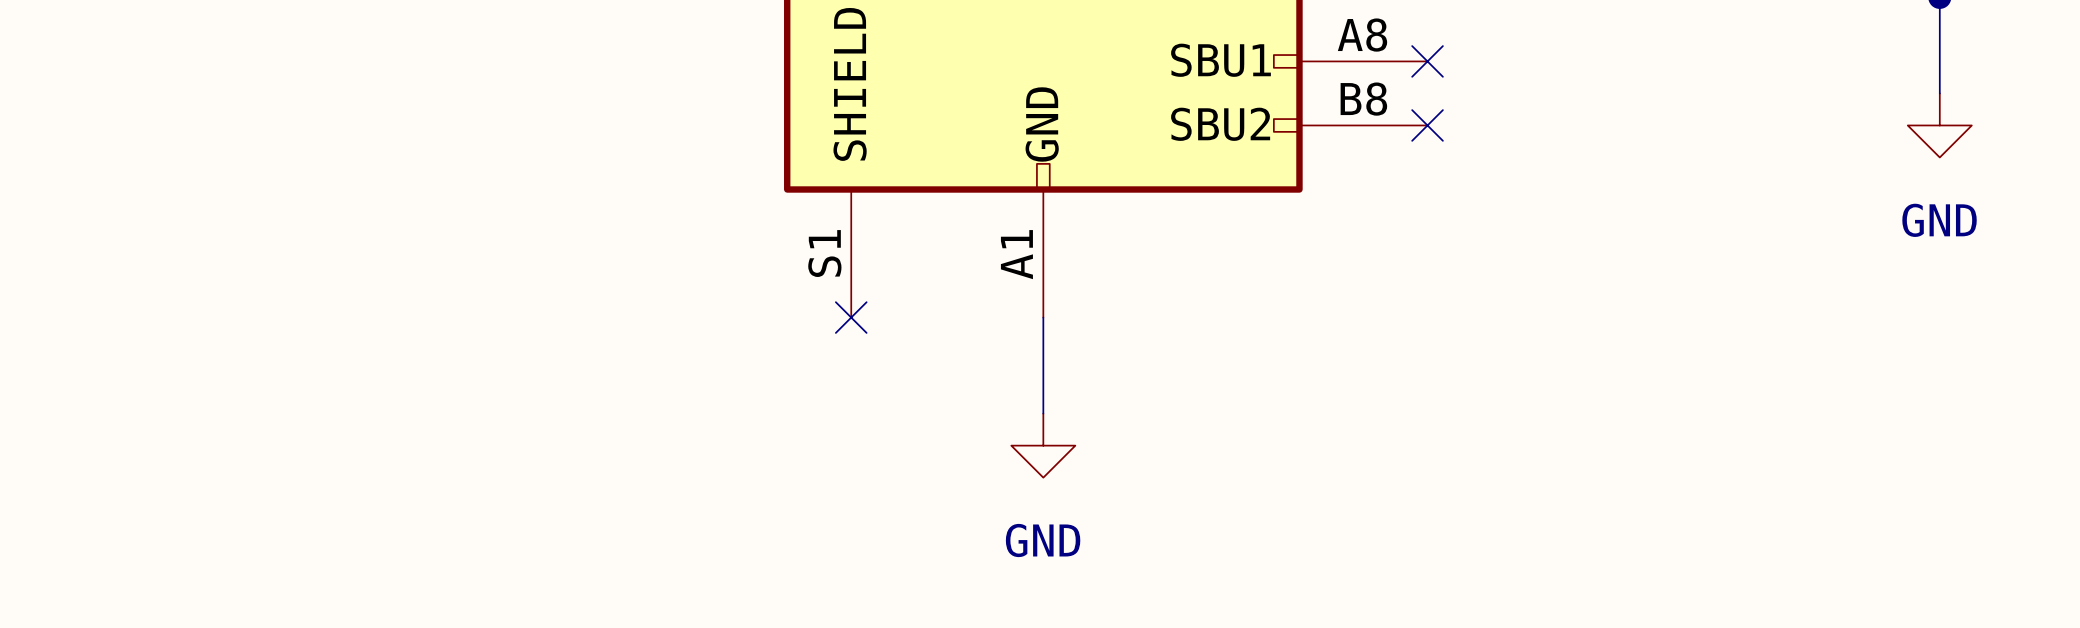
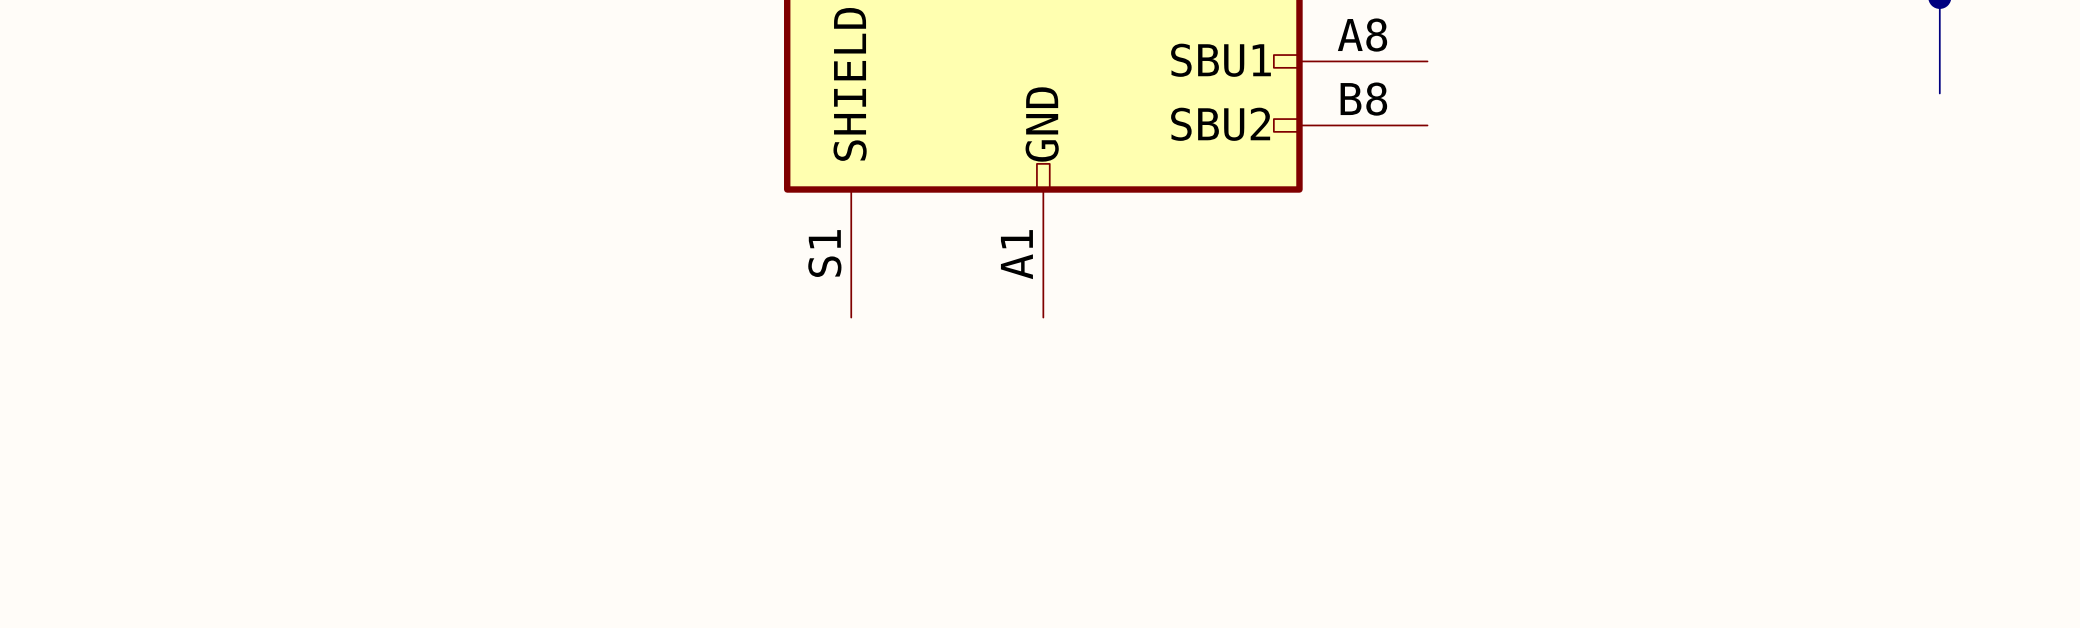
no-connect mark: (1427, 61) -> none
no-connect mark: (1427, 125) -> none
power symbol: GND (1939, 125) -> none
no-connect mark: (851, 317) -> none
wire: (1043, 317) (1043, 413) -> none
power symbol: GND (1043, 445) -> none

